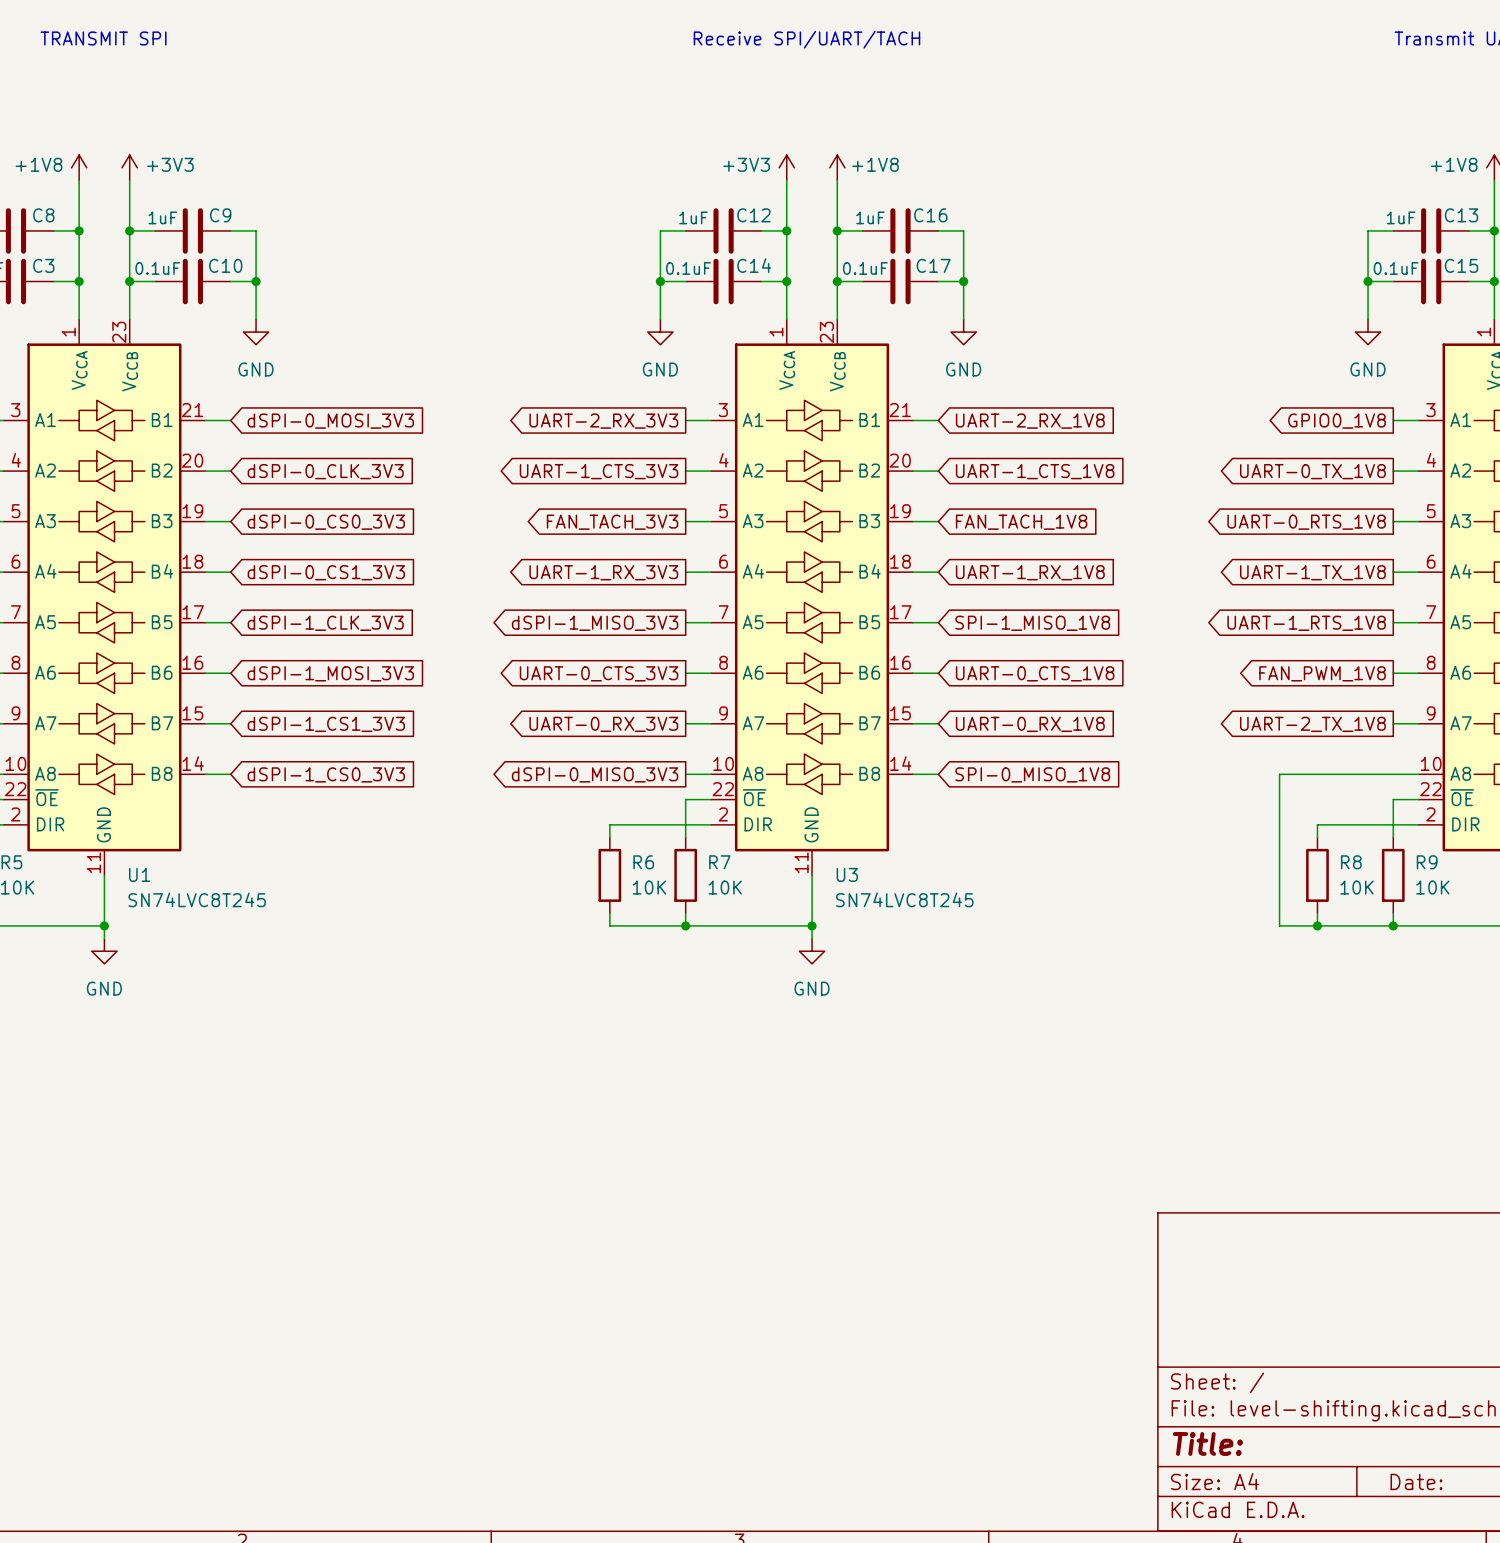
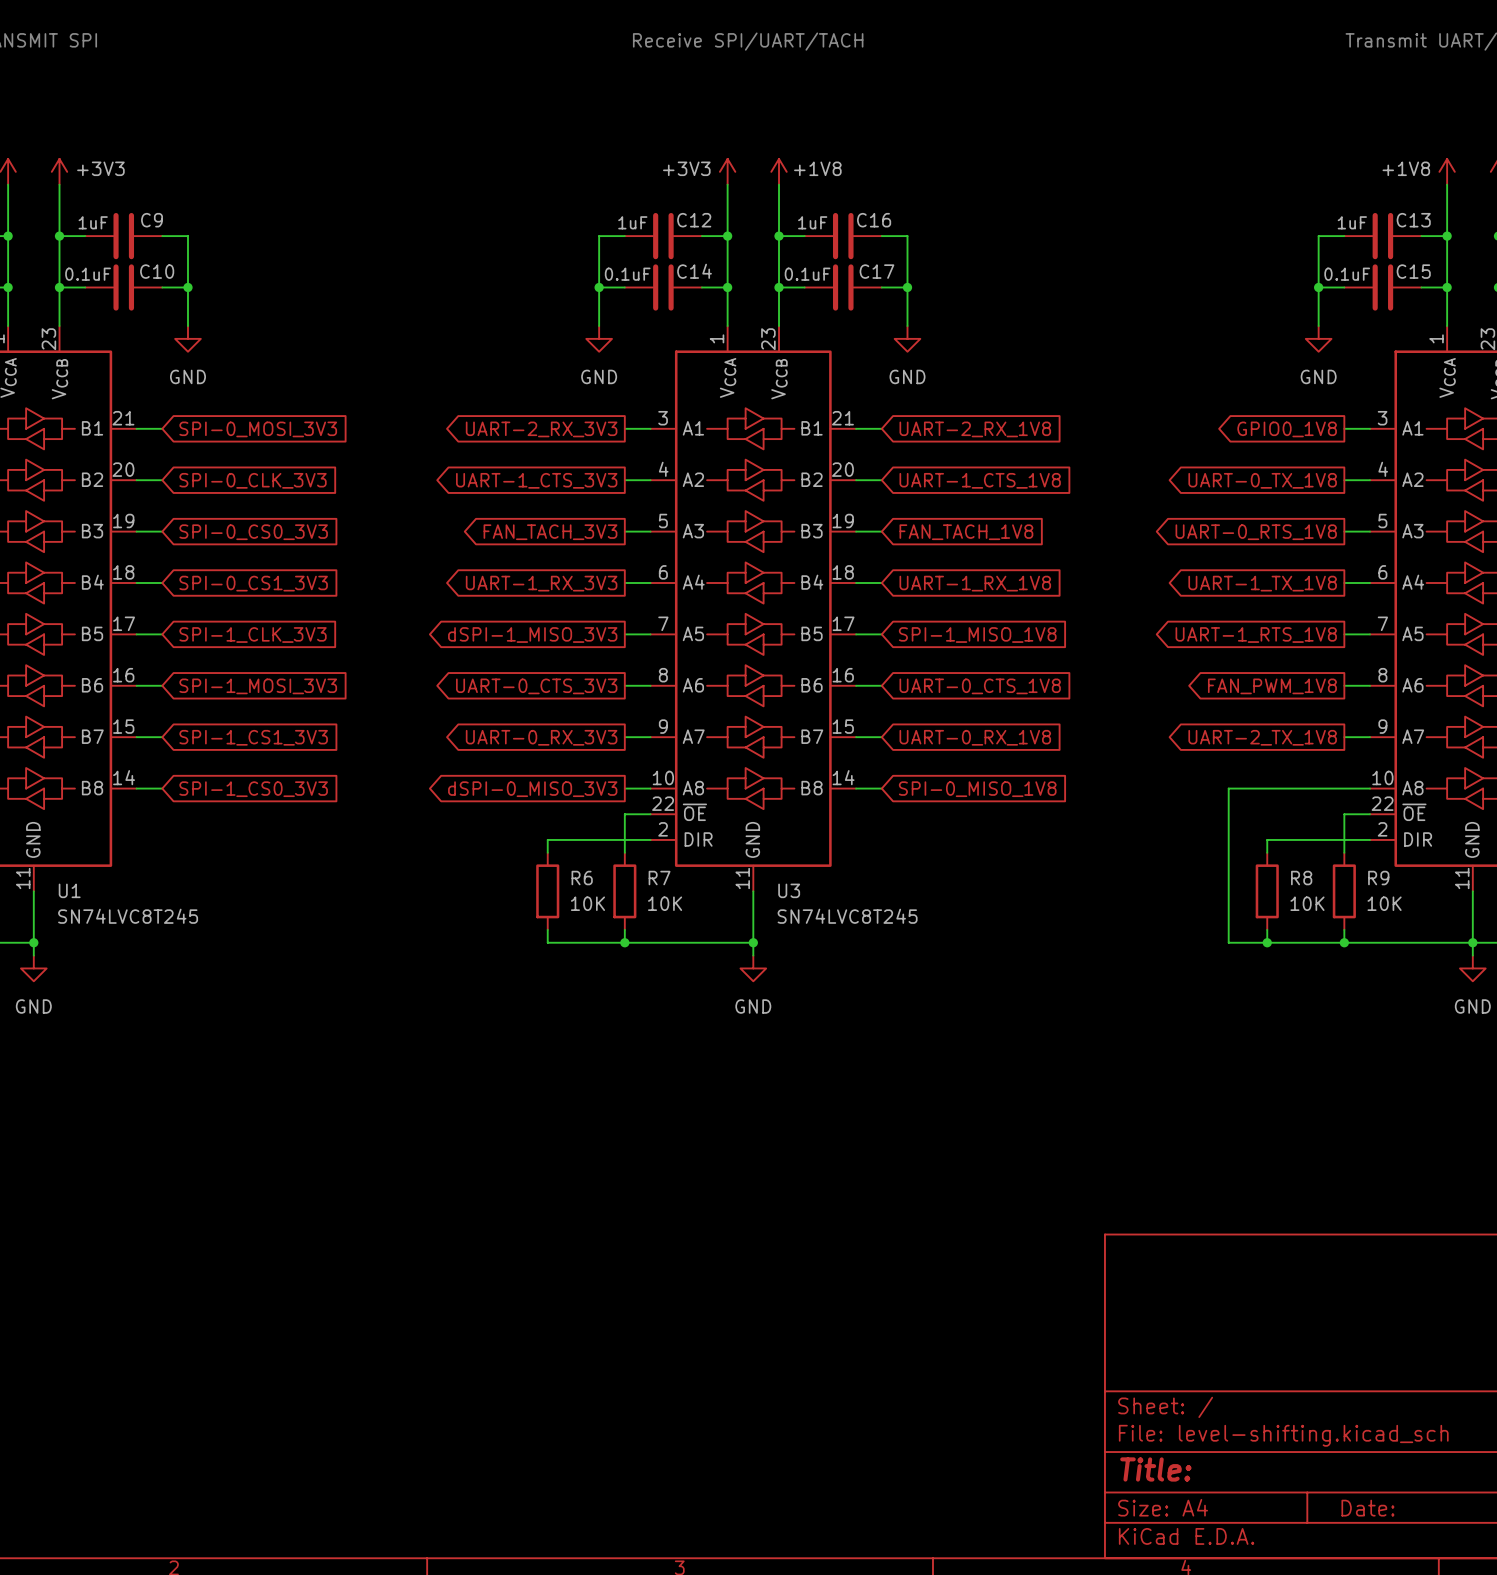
global label: dSPI-0_MOSI_3V3 (330, 421) -> SPI-0_MOSI_3V3 (258, 429)
global label: dSPI-0_CLK_3V3 (325, 471) -> SPI-0_CLK_3V3 (253, 480)
global label: dSPI-0_CS0_3V3 (326, 522) -> SPI-0_CS0_3V3 (253, 532)
global label: dSPI-0_CS1_3V3 (326, 572) -> SPI-0_CS1_3V3 (253, 583)
global label: dSPI-1_CLK_3V3 (325, 623) -> SPI-1_CLK_3V3 (253, 635)
global label: dSPI-1_MOSI_3V3 (330, 673) -> SPI-1_MOSI_3V3 (258, 686)
global label: dSPI-1_CS1_3V3 (326, 724) -> SPI-1_CS1_3V3 (253, 737)
global label: dSPI-1_CS0_3V3 (326, 774) -> SPI-1_CS0_3V3 (253, 789)

